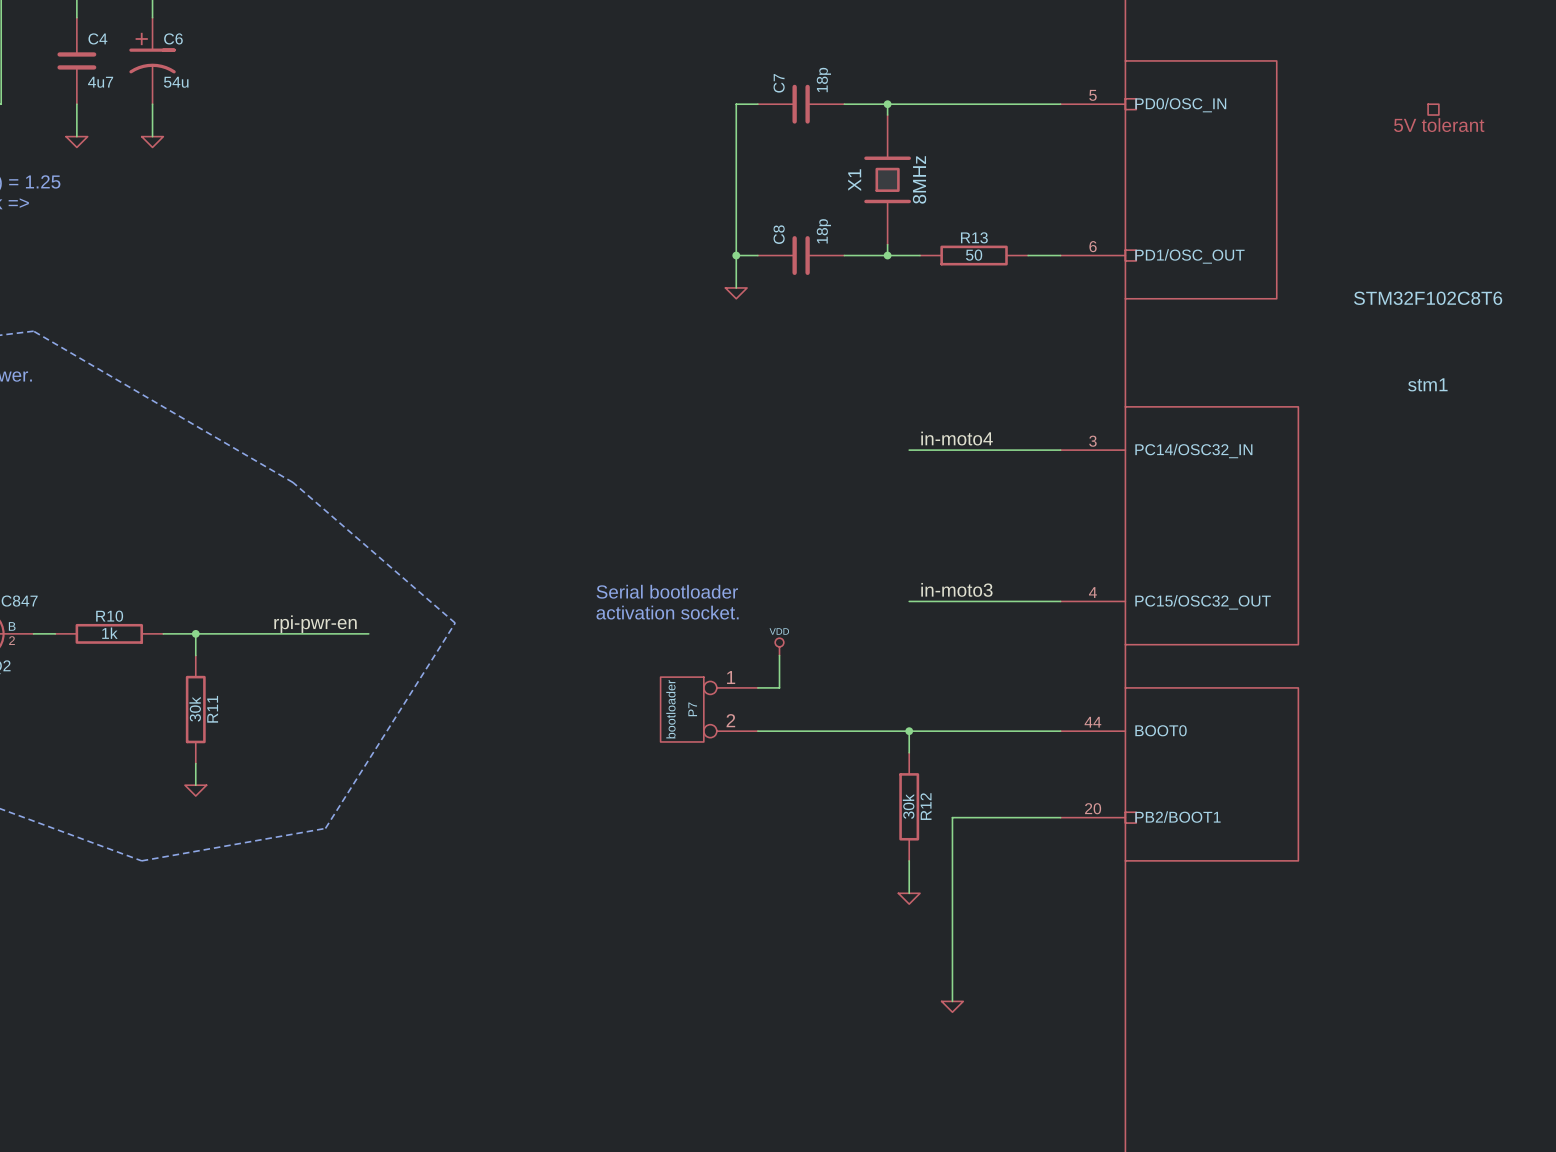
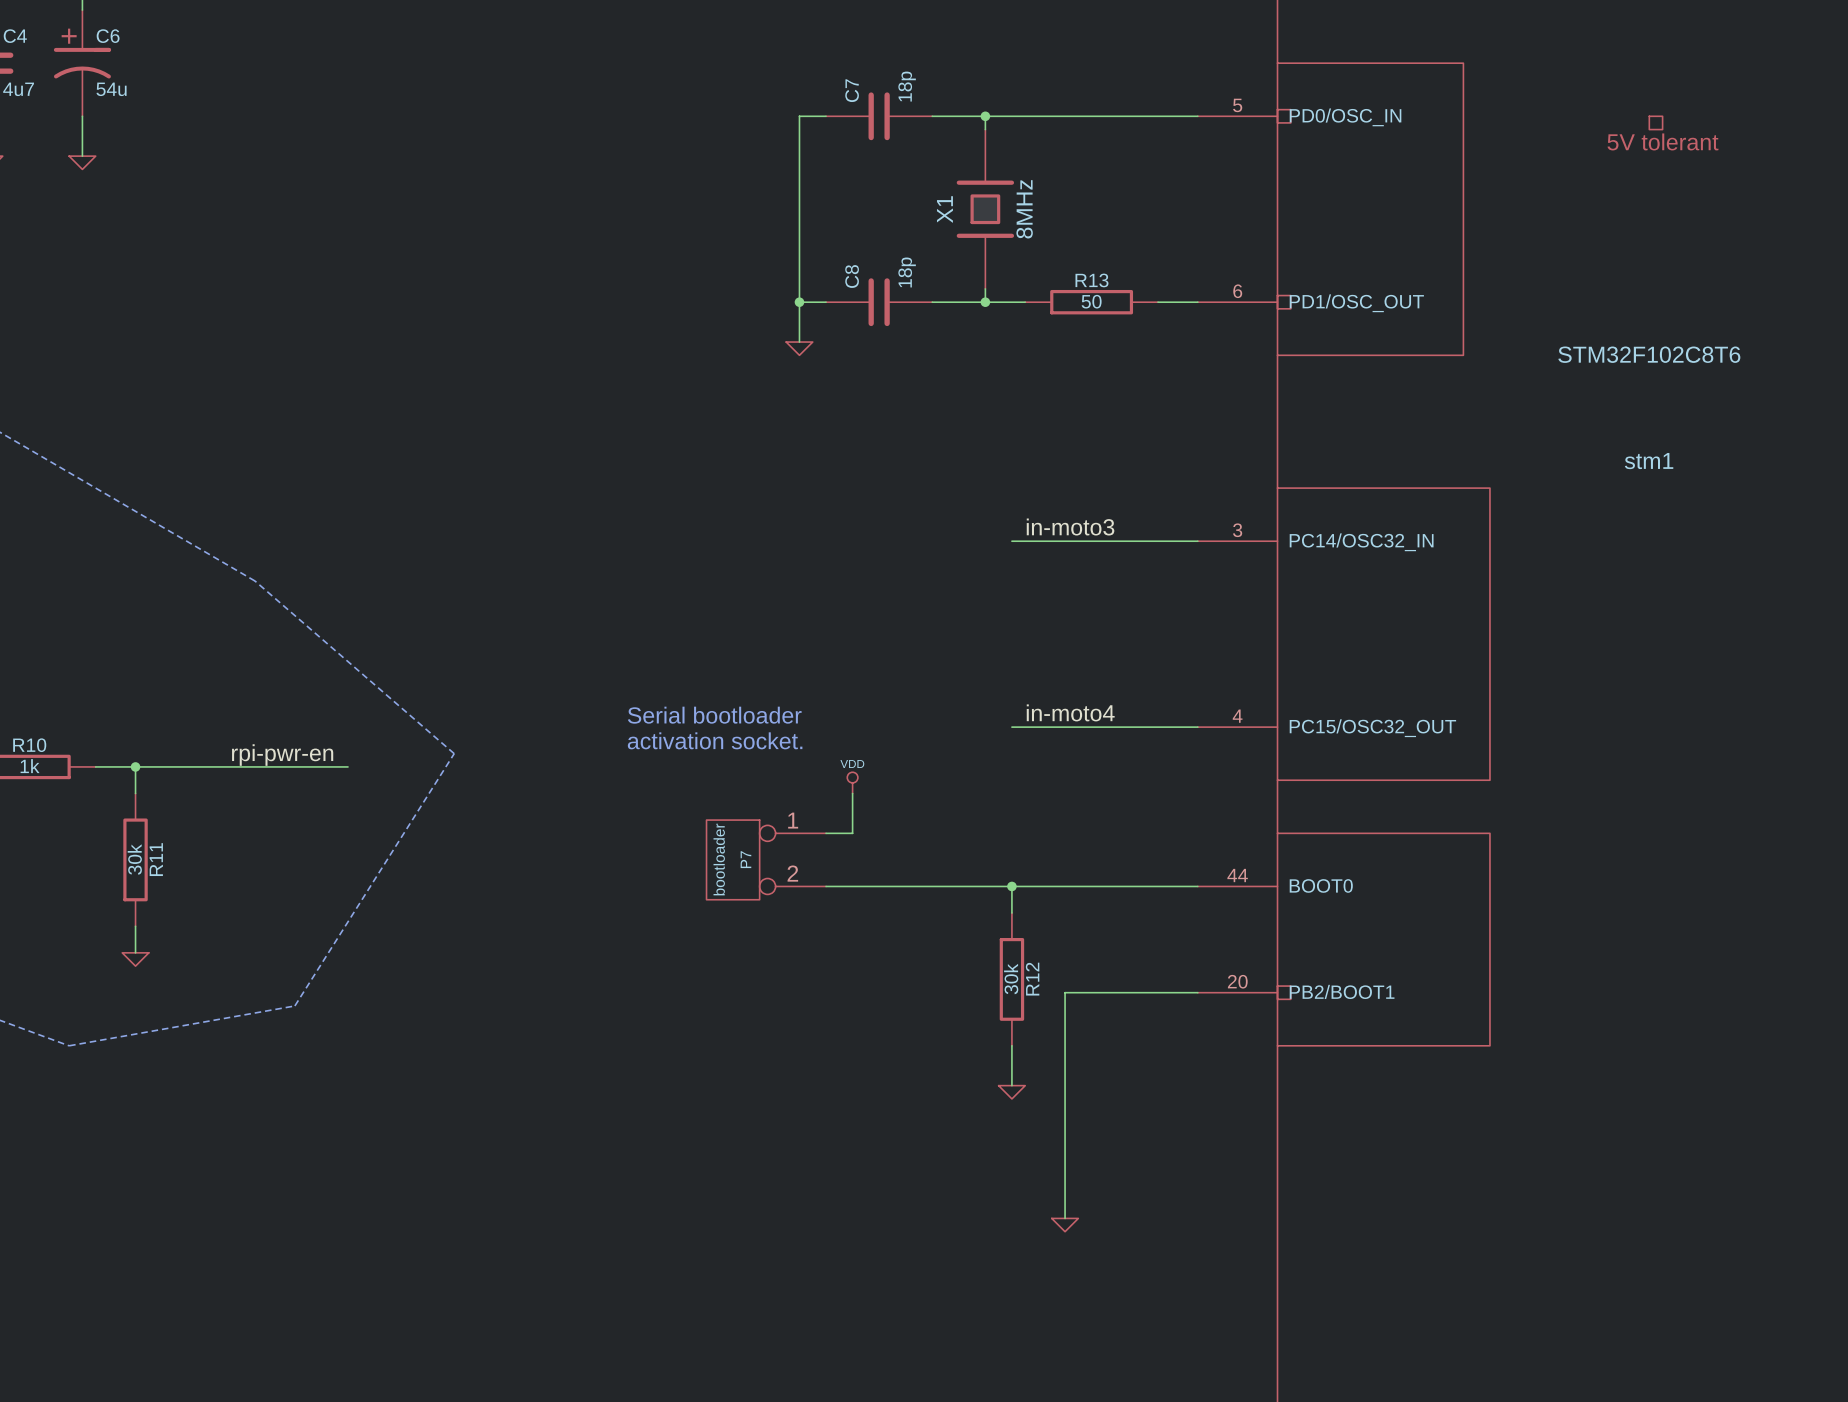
label: in-moto4 (957, 438) -> in-moto3 (1070, 527)
label: in-moto3 (956, 589) -> in-moto4 (1070, 712)

